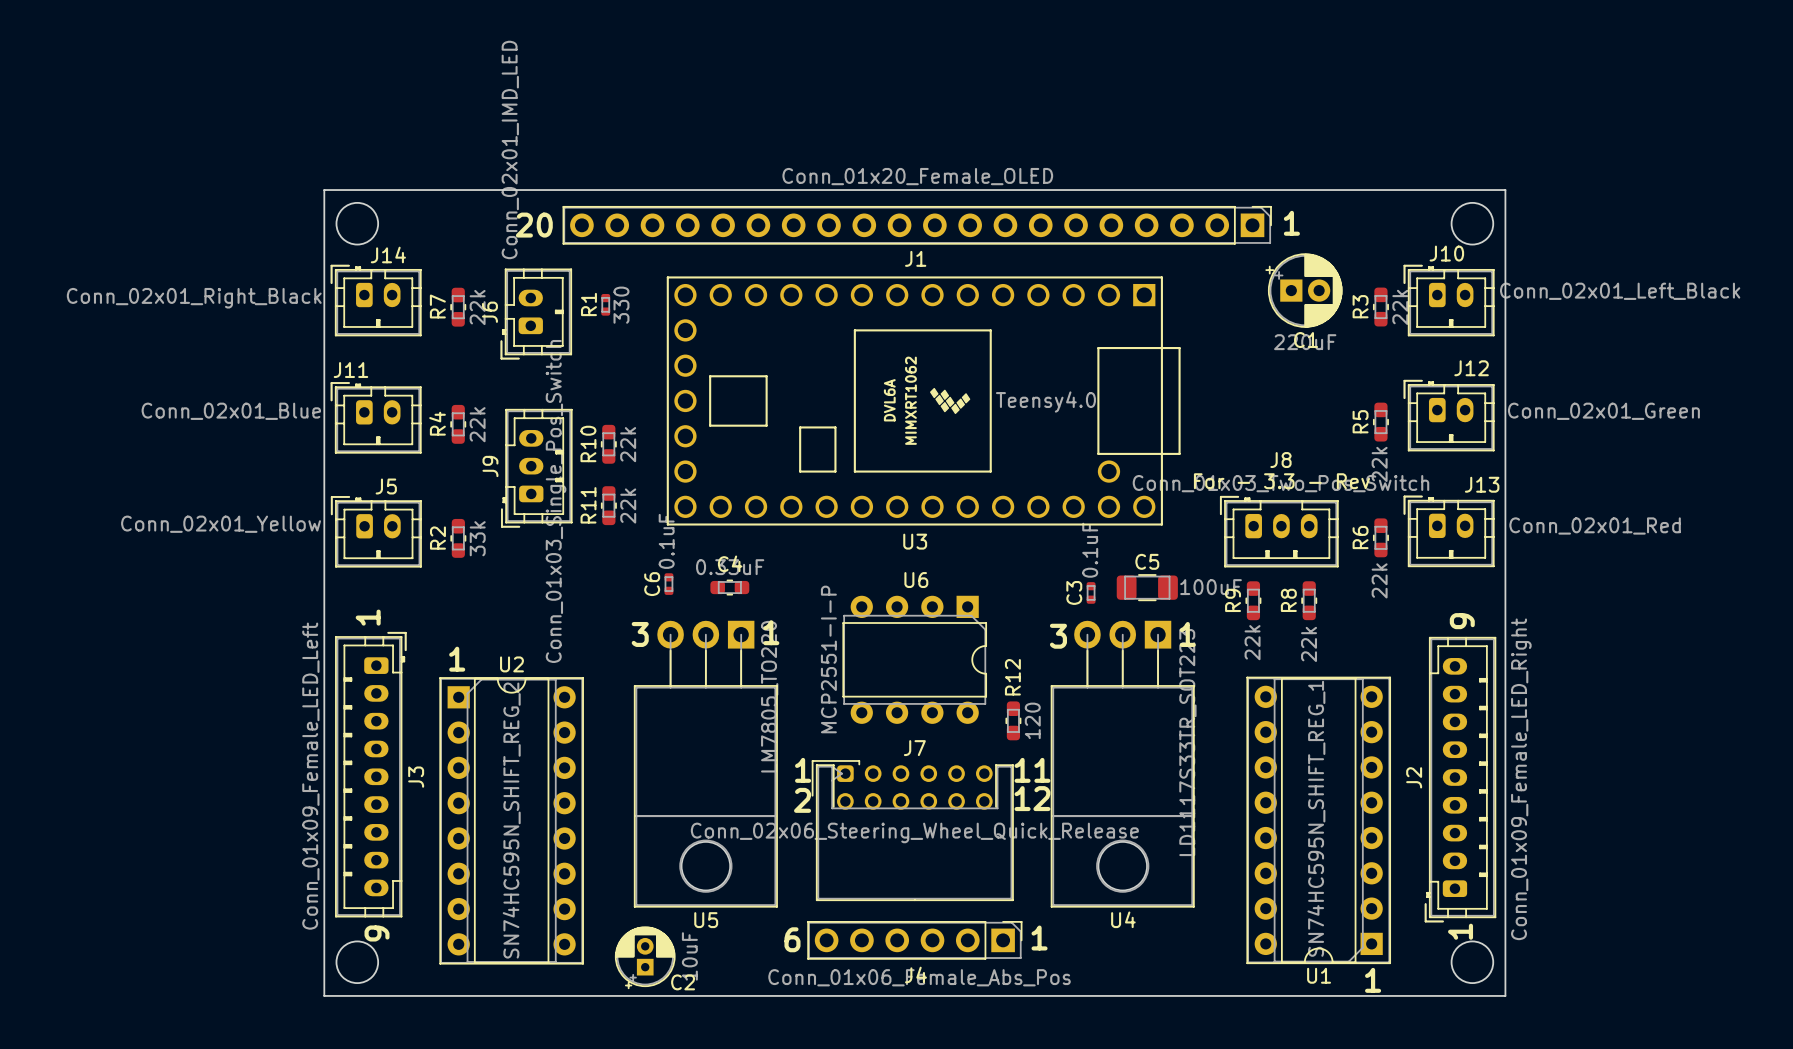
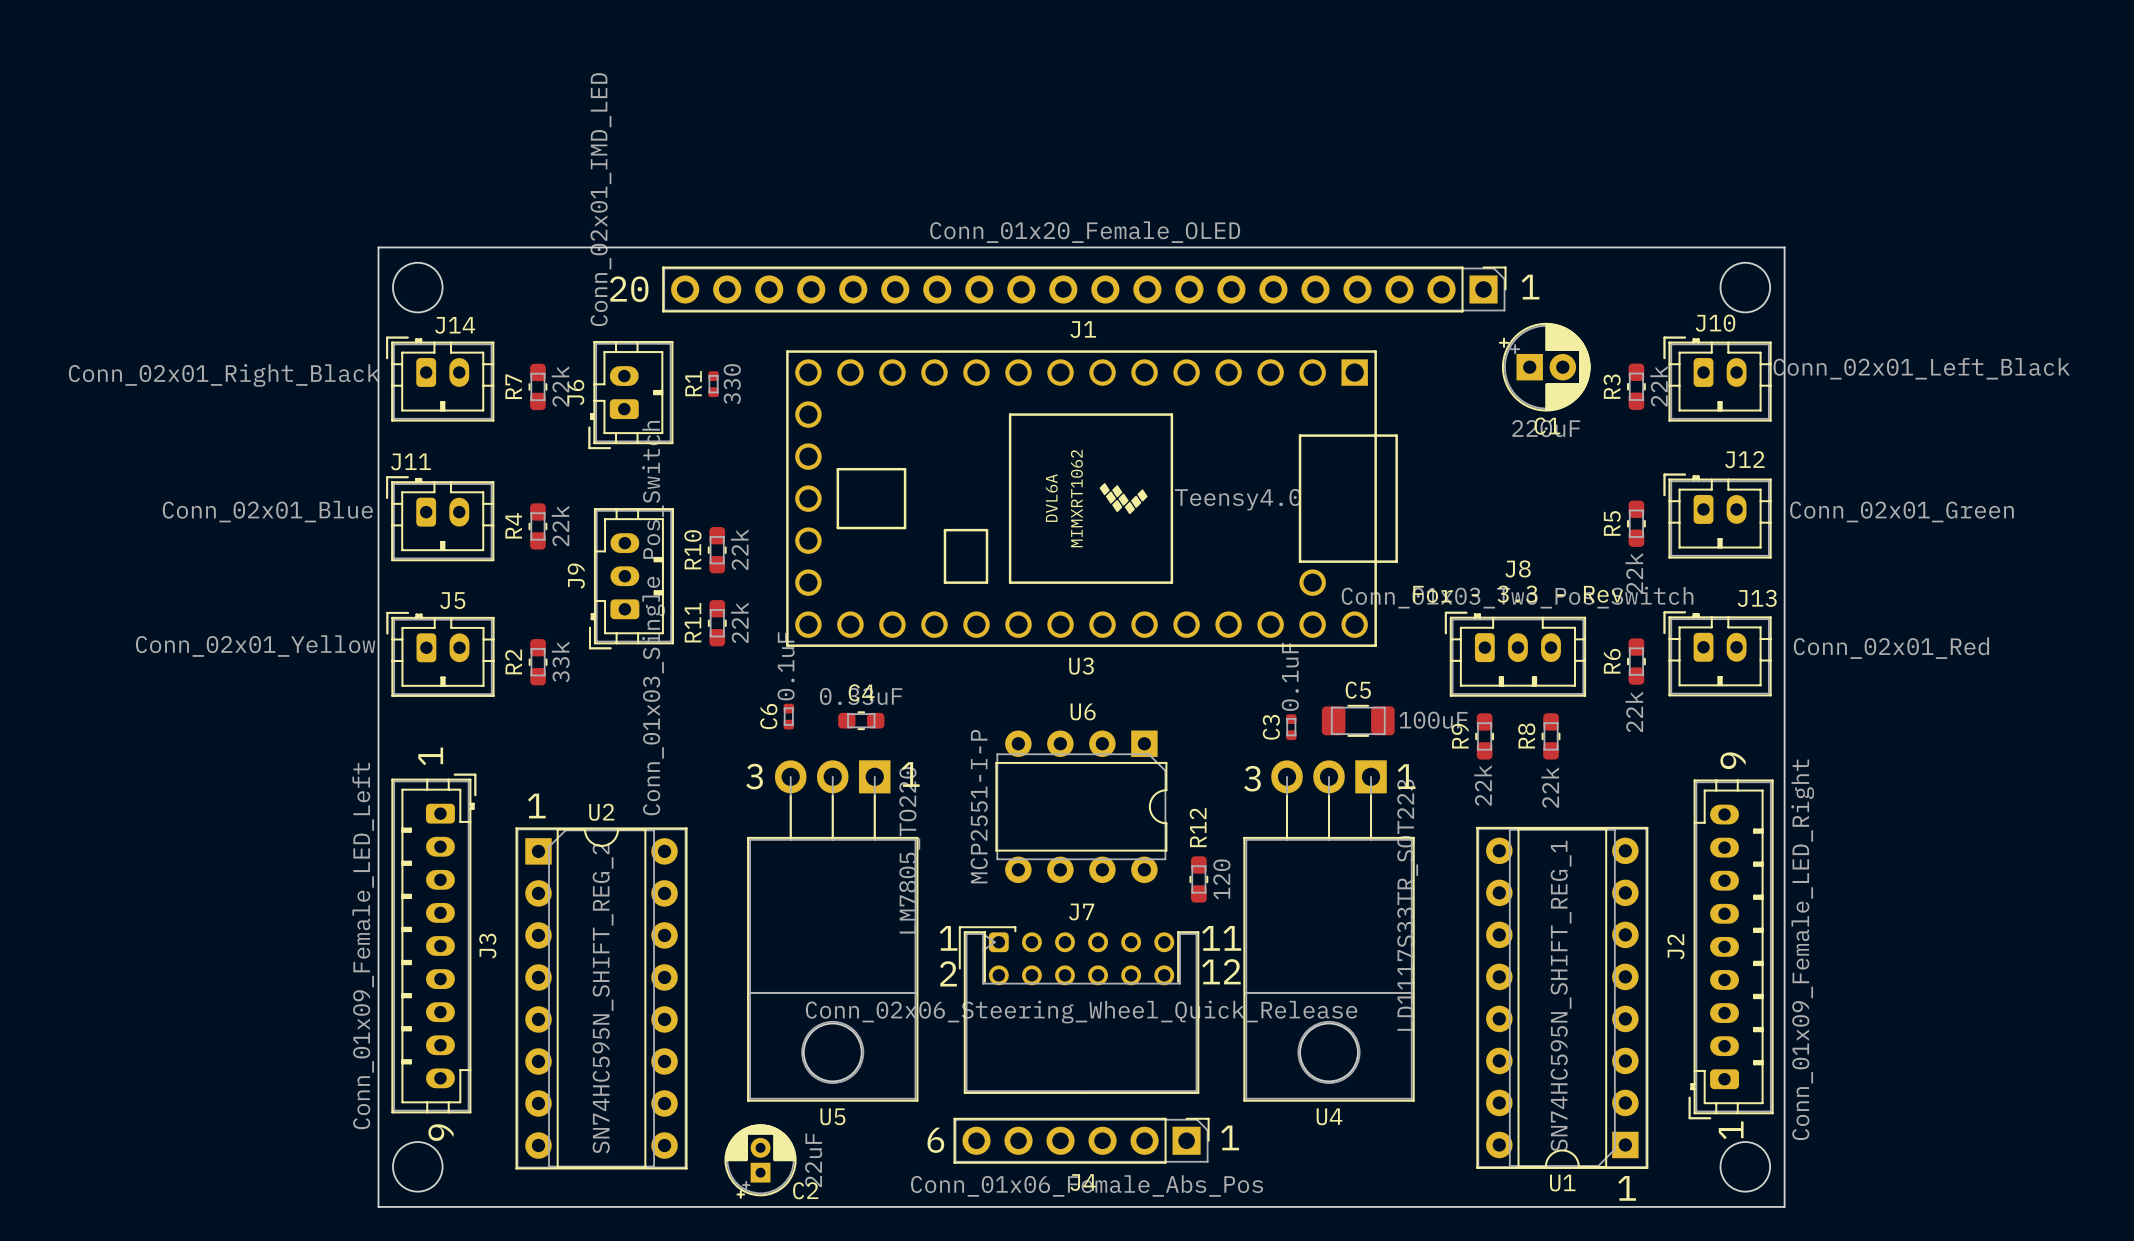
C2 value: 10uF (689, 956) -> 22uF (813, 1160)

